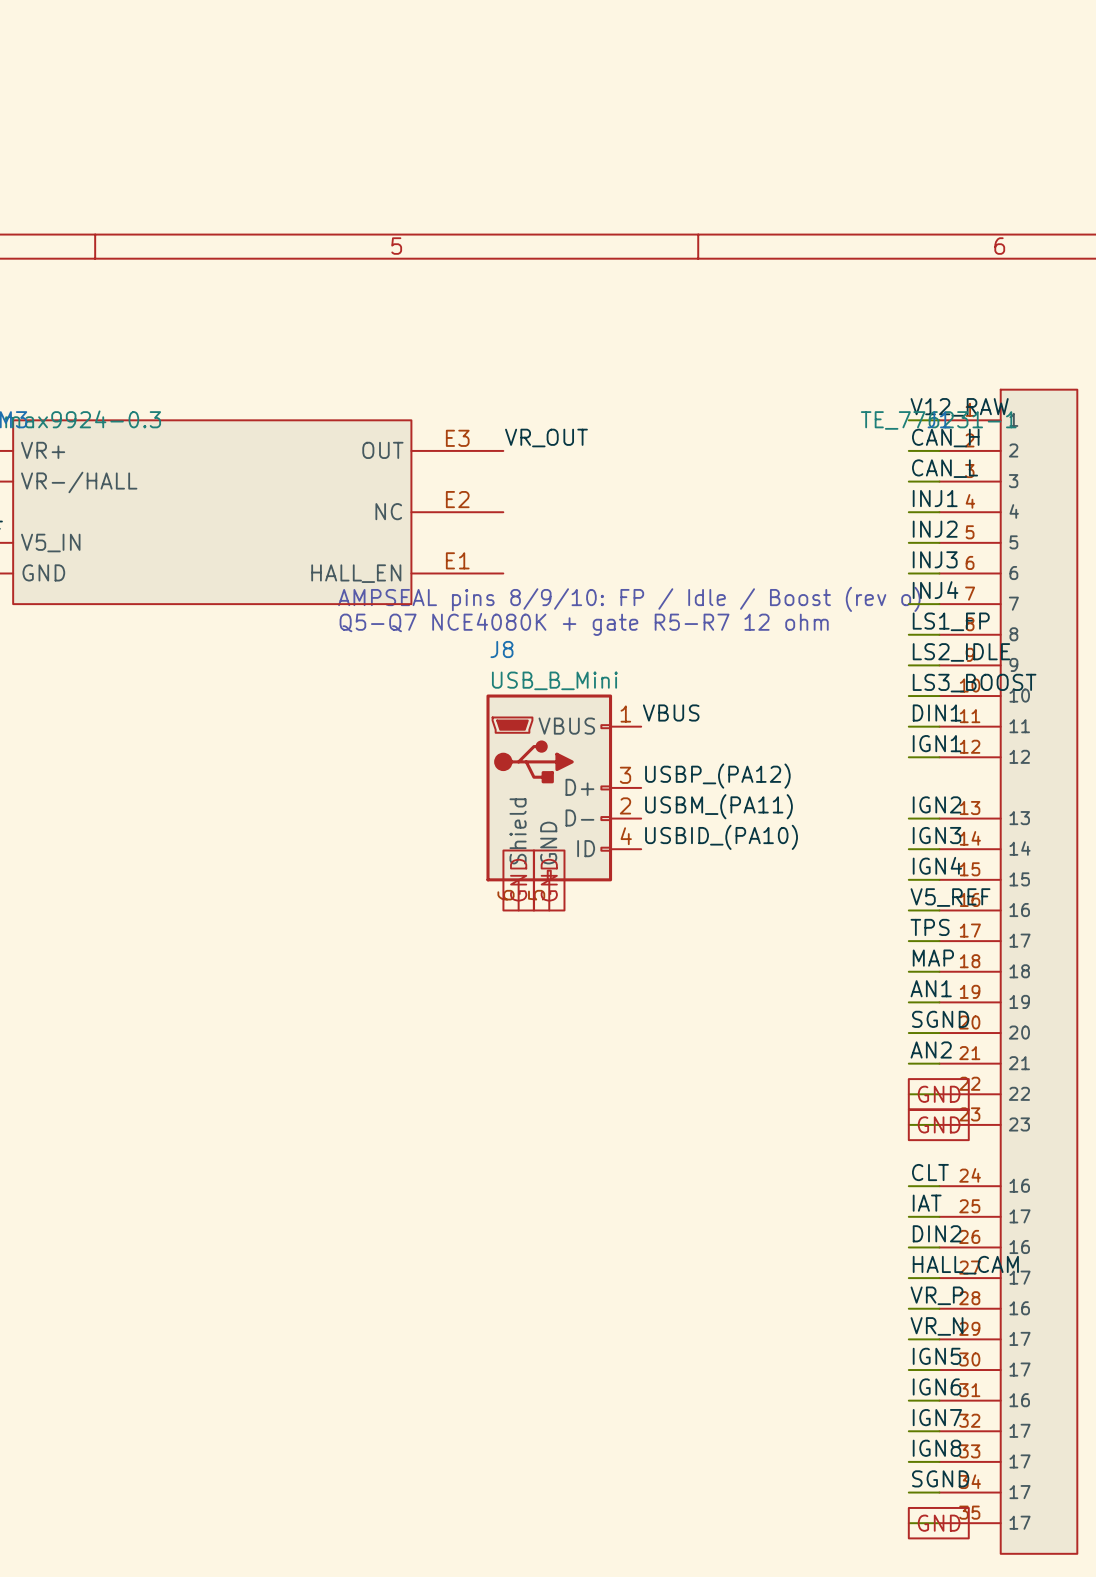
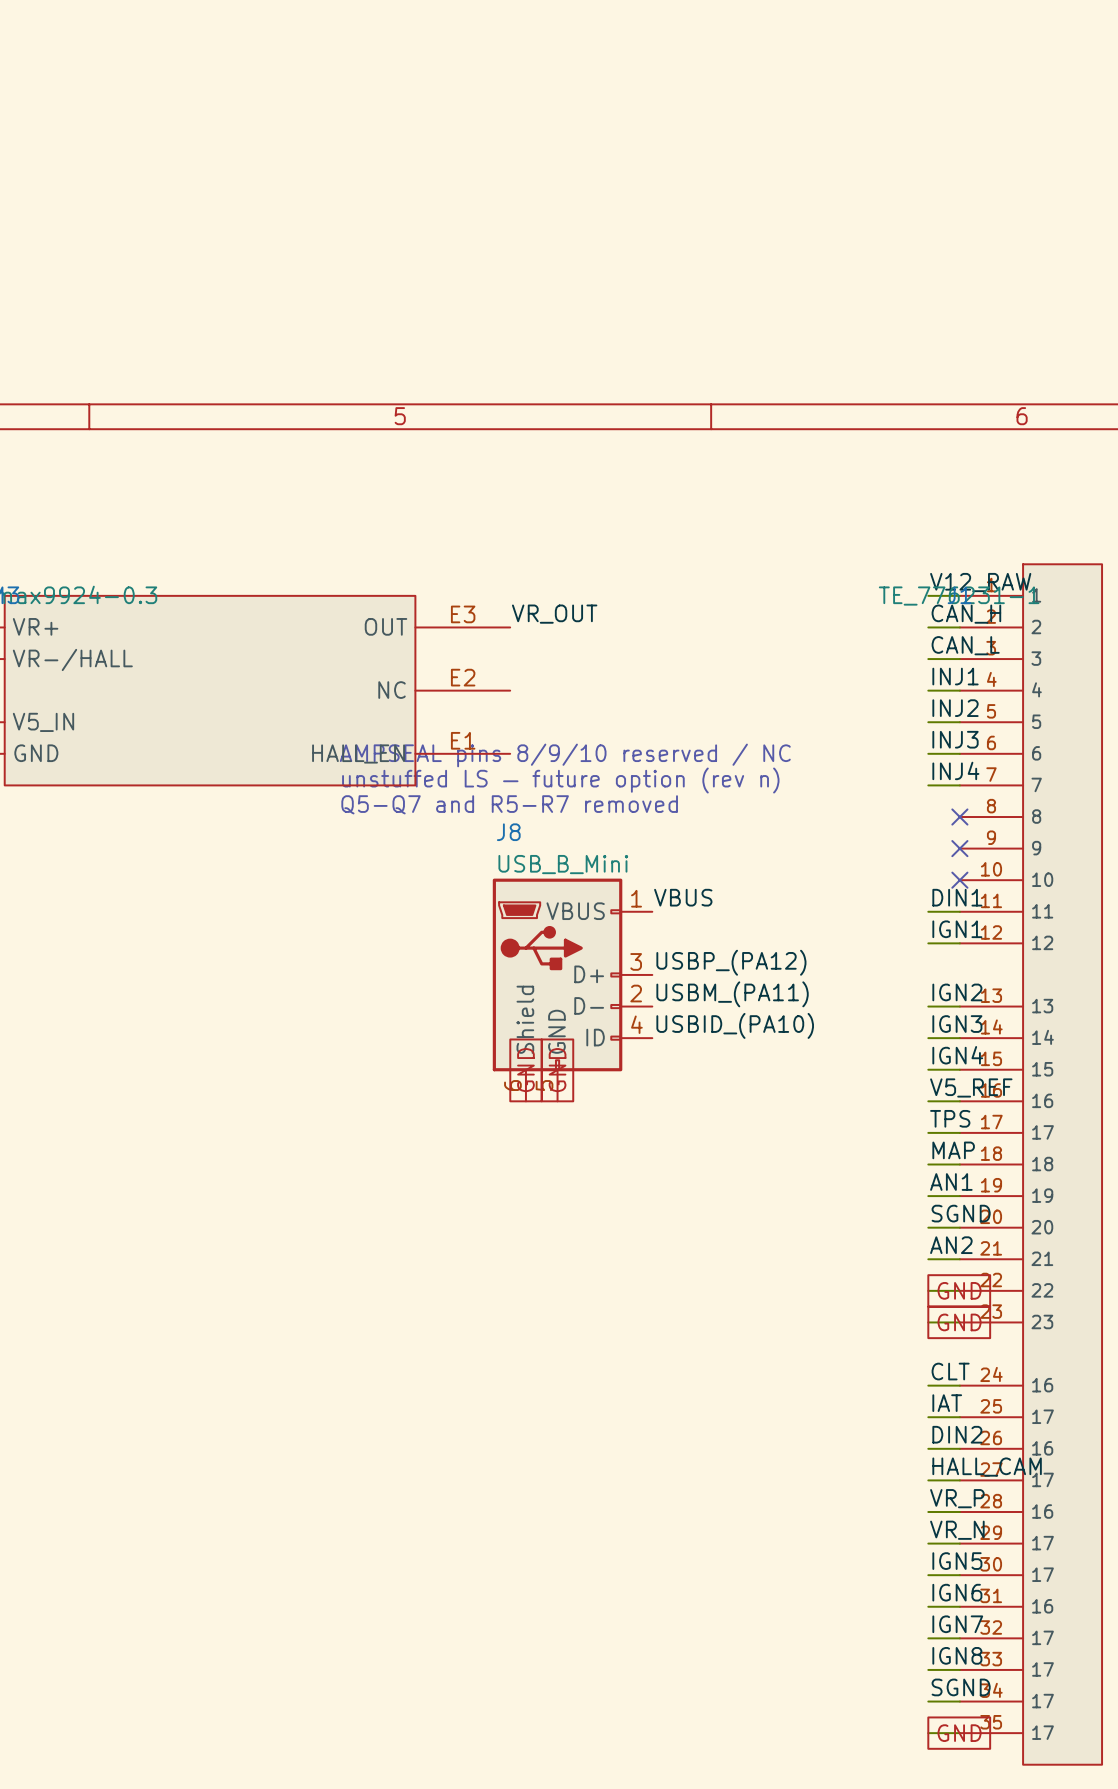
text: none -> AMPSEAL pins 8/9/10 reserved / NC (565, 755)
text: AMPSEAL pins 8/9/10: FP / Idle / Boost (rev o) (629, 599) -> unstuffed LS — future option (rev n) (560, 780)
label: LS1_FP (951, 621) -> none
text: Q5-Q7 NCE4080K + gate R5-R7 12 ohm (584, 624) -> Q5-Q7 and R5-R7 removed (509, 804)
wire: (908, 634) (939, 634) -> none
no-connect mark: none -> (959, 817)
label: LS2_IDLE (961, 652) -> none
wire: (908, 665) (939, 665) -> none
no-connect mark: none -> (959, 848)
label: LS3_BOOST (974, 683) -> none
wire: (908, 696) (939, 696) -> none
no-connect mark: none -> (959, 880)

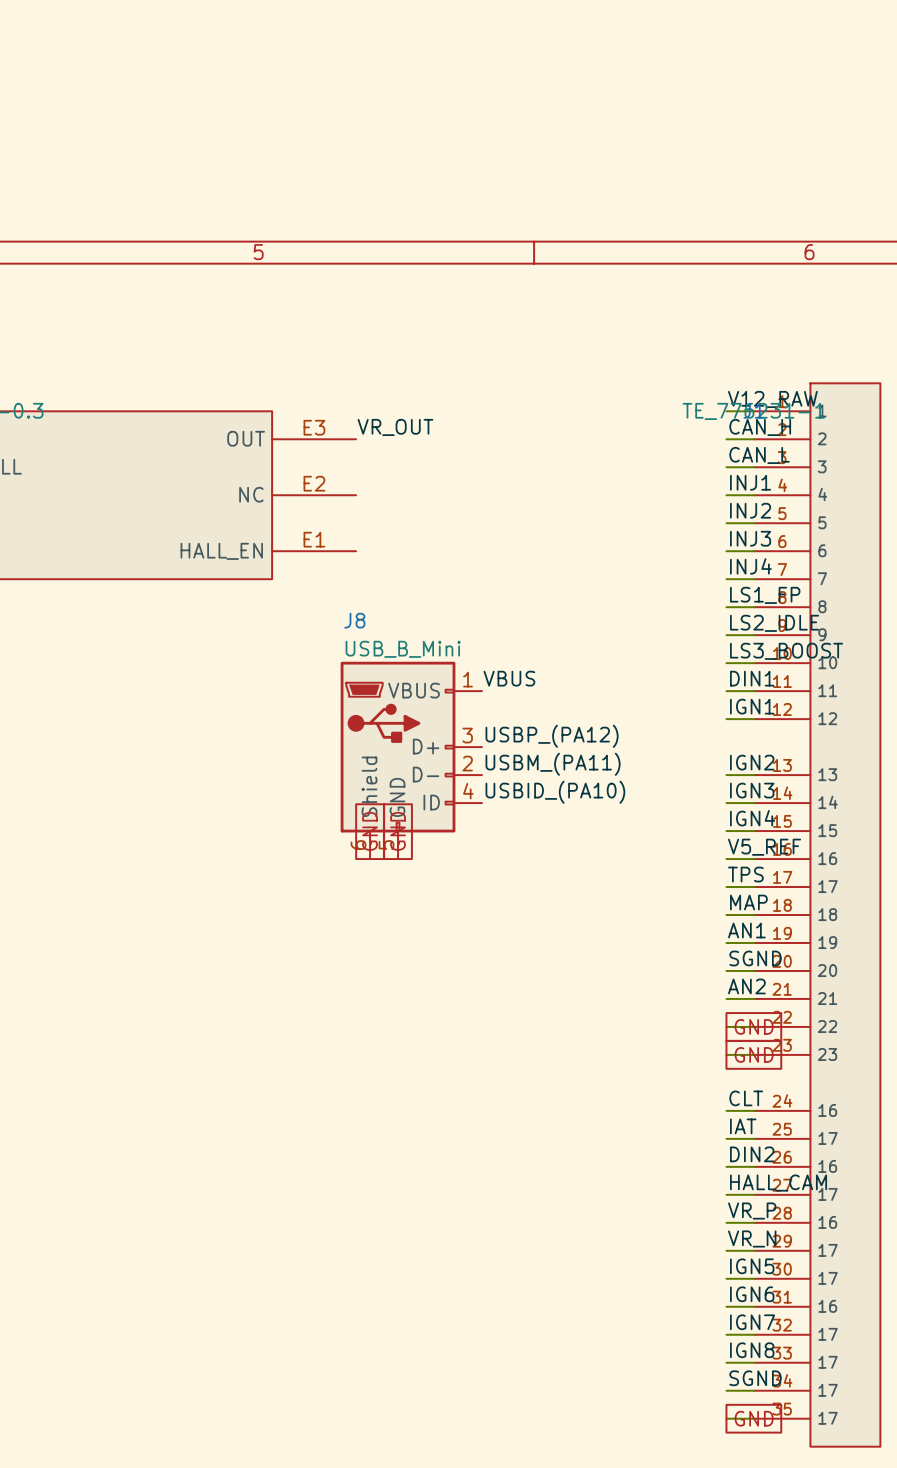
text: AMPSEAL pins 8/9/10 reserved / NC (565, 755) -> none
text: unstuffed LS — future option (rev n) (560, 780) -> none
label: none -> LS1_FP (765, 595)
text: Q5-Q7 and R5-R7 removed (509, 804) -> none
wire: none -> (726, 607) (754, 607)
no-connect mark: (959, 817) -> none
label: none -> LS2_IDLE (774, 623)
wire: none -> (726, 635) (754, 635)
no-connect mark: (959, 848) -> none
label: none -> LS3_BOOST (786, 651)
wire: none -> (726, 663) (754, 663)
no-connect mark: (959, 880) -> none

